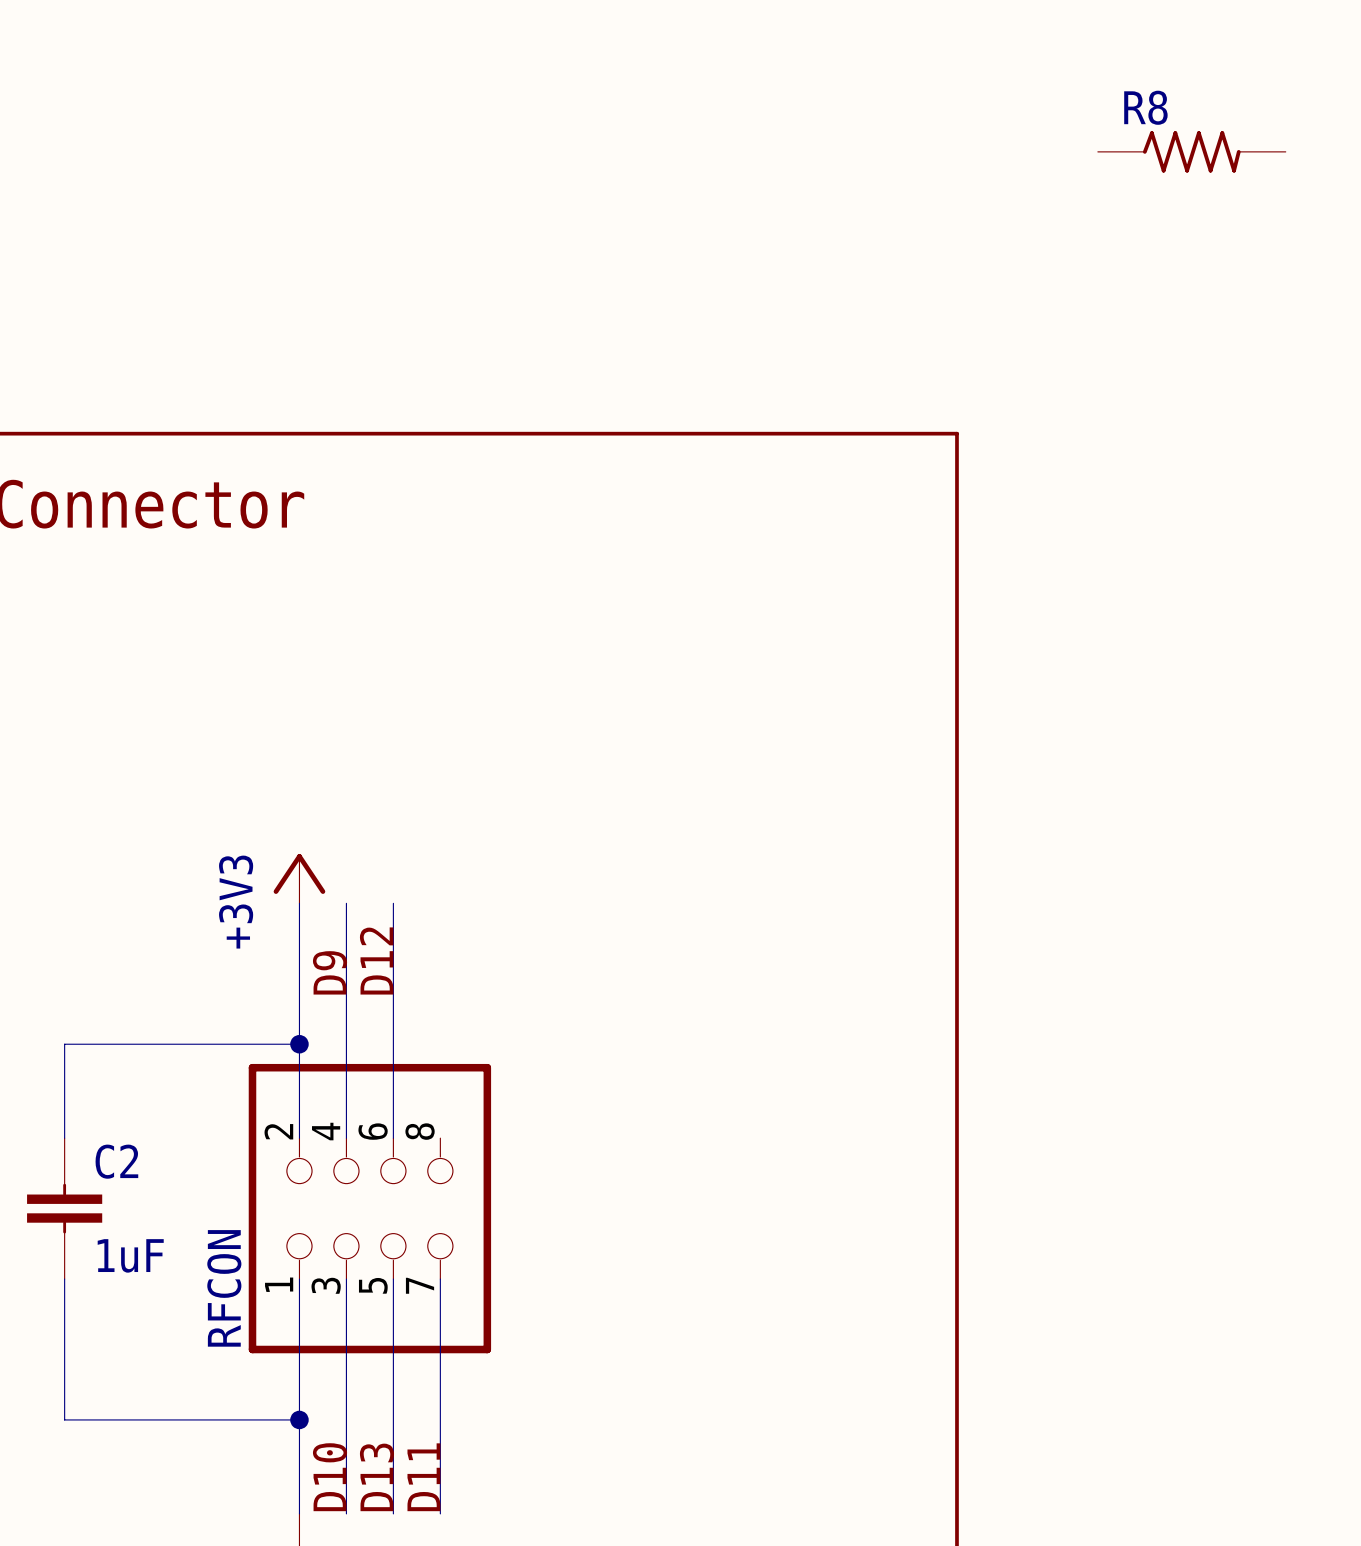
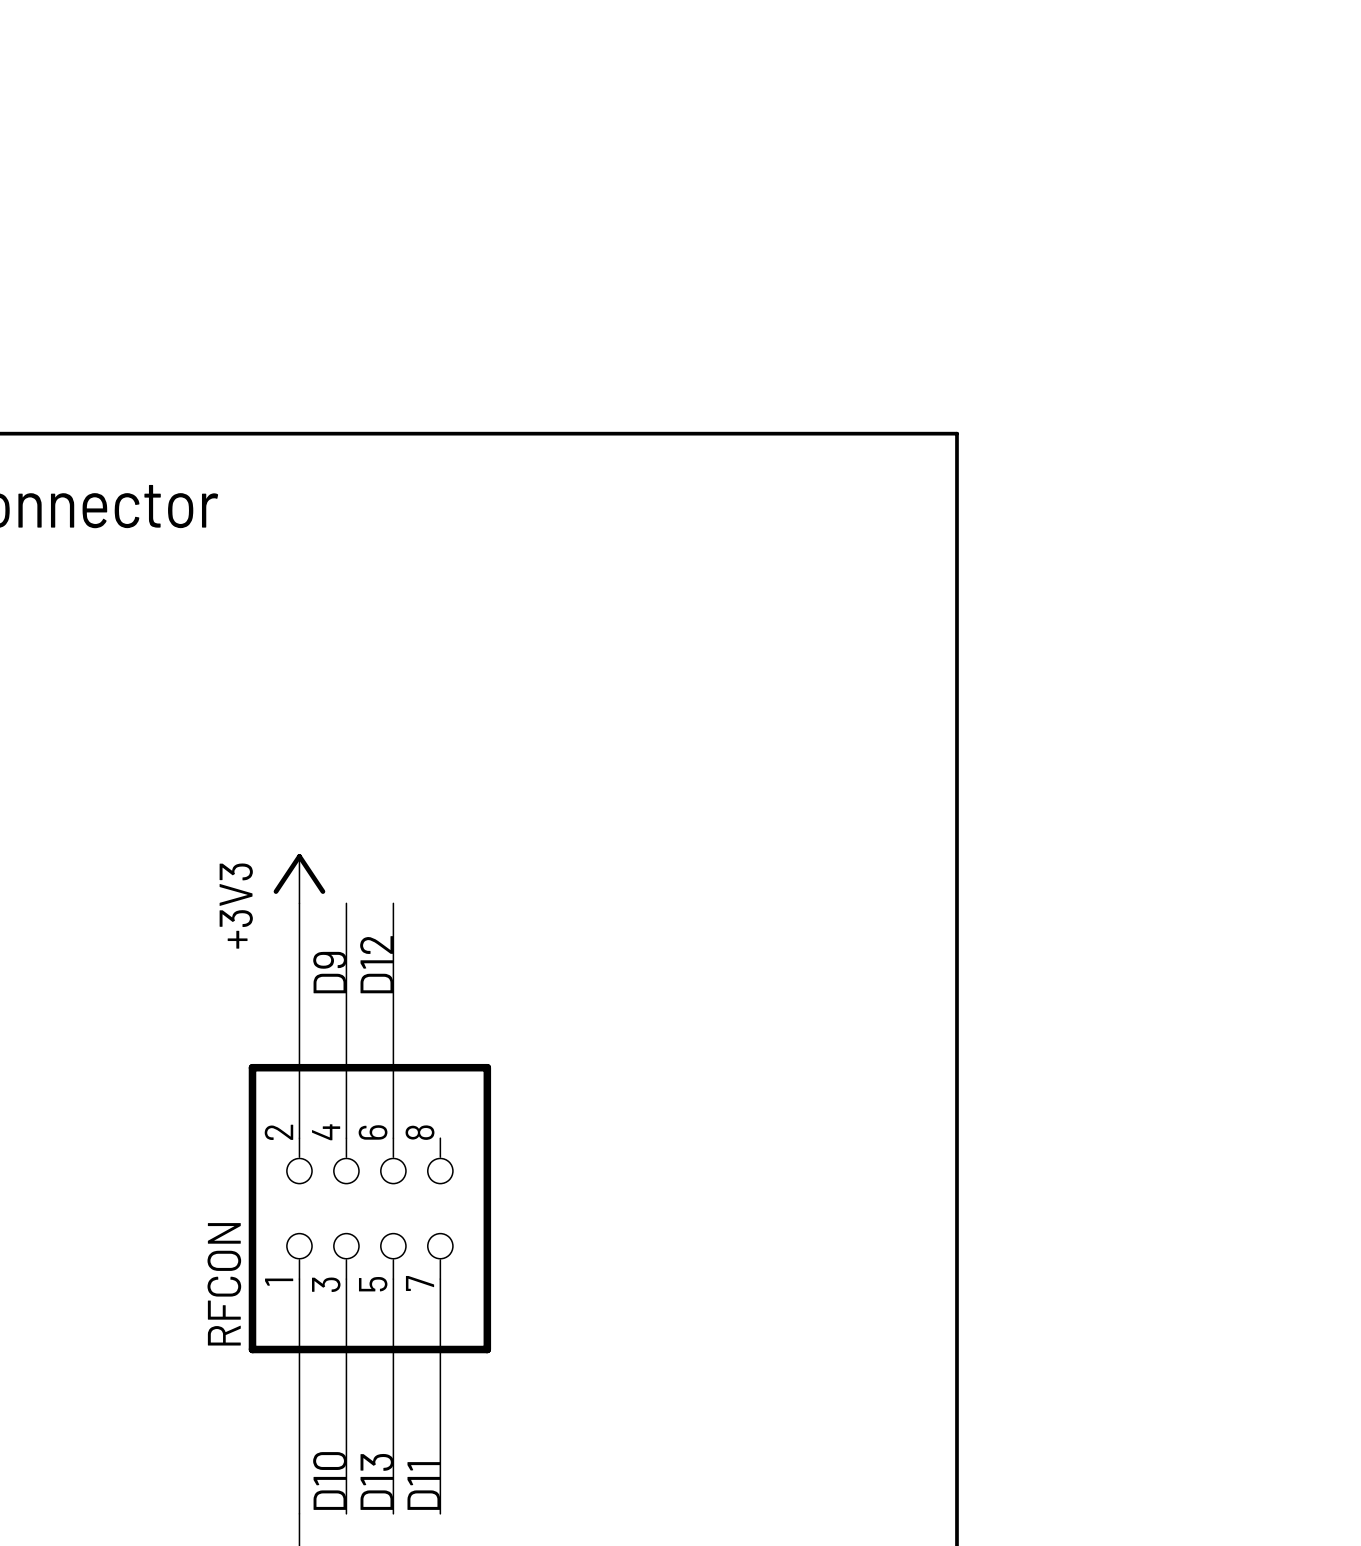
R8: (1191, 151) -> none
wire: (299, 1044) (64, 1044) (64, 1138) -> none
junction: (299, 1044) -> none
C2: 1uF (64, 1208) -> none
wire: (64, 1279) (64, 1419) (299, 1419) -> none
junction: (299, 1419) -> none

